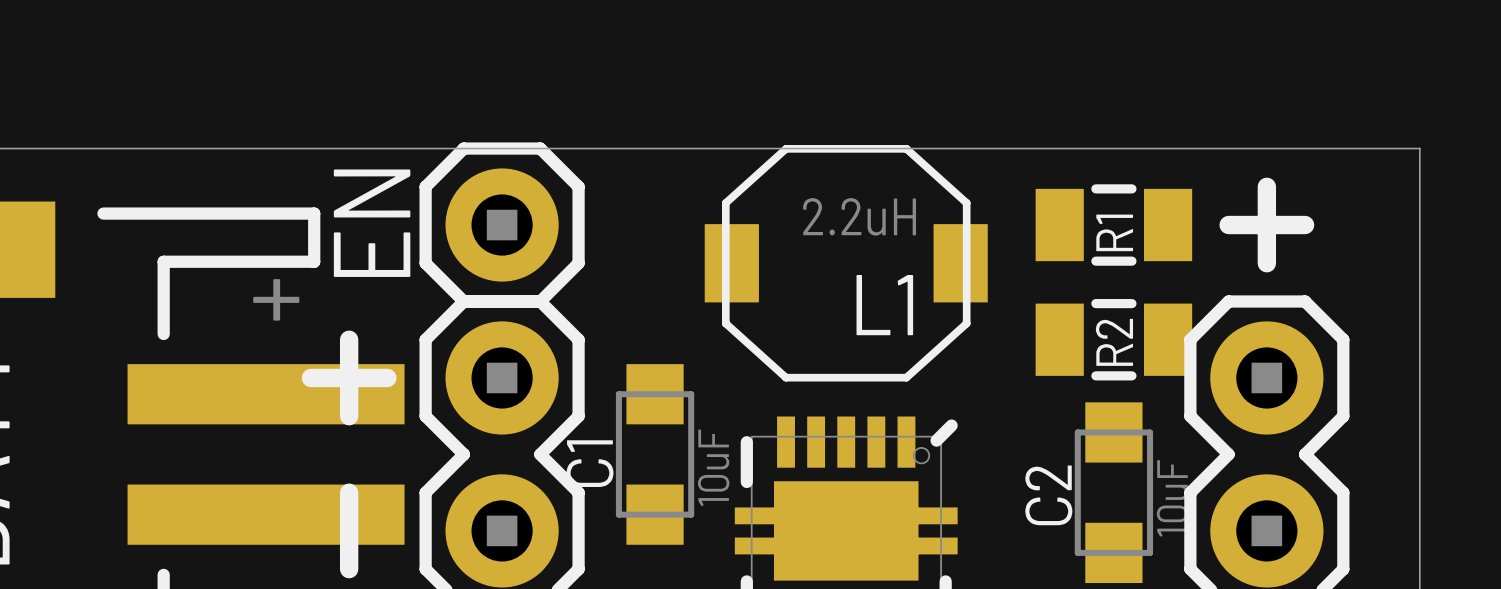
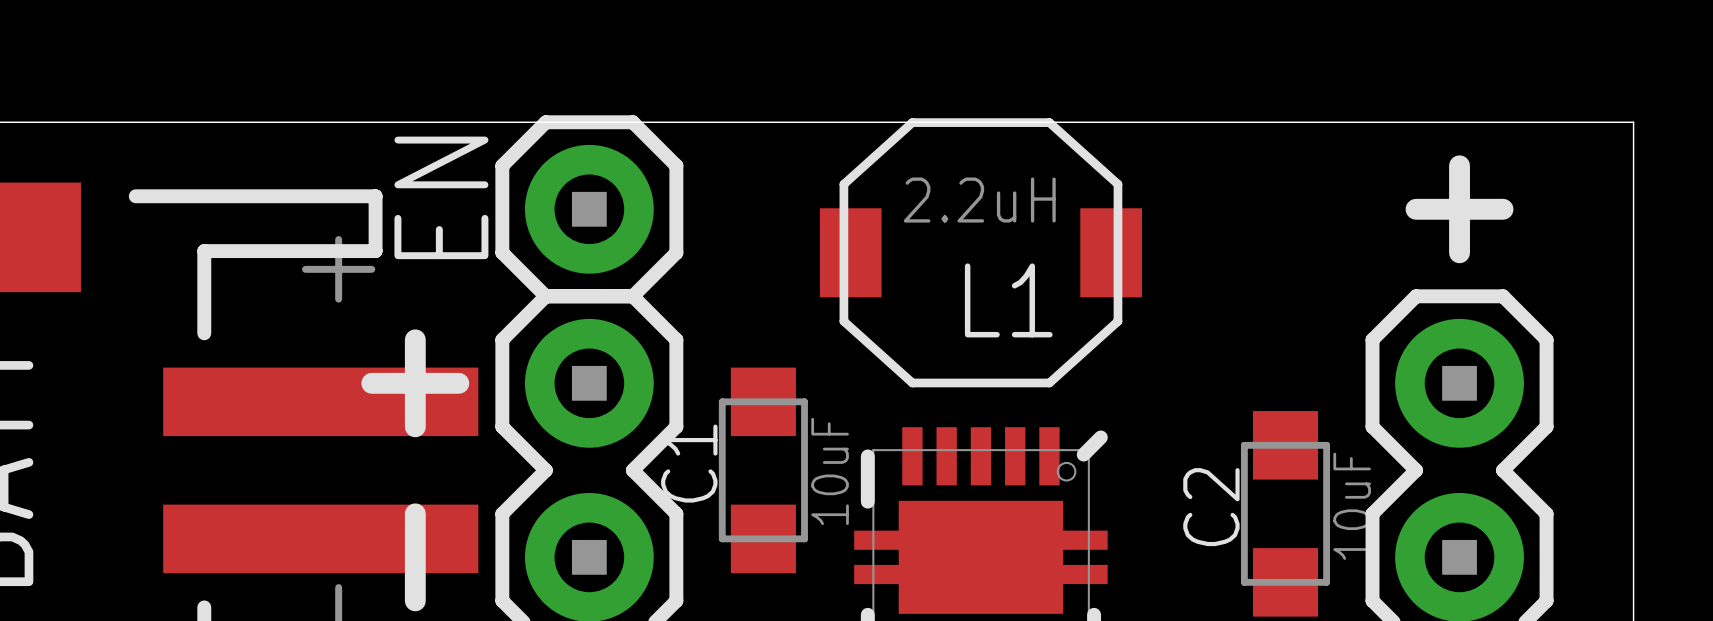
R1: (1113, 225) -> none
R2: (1113, 339) -> none

